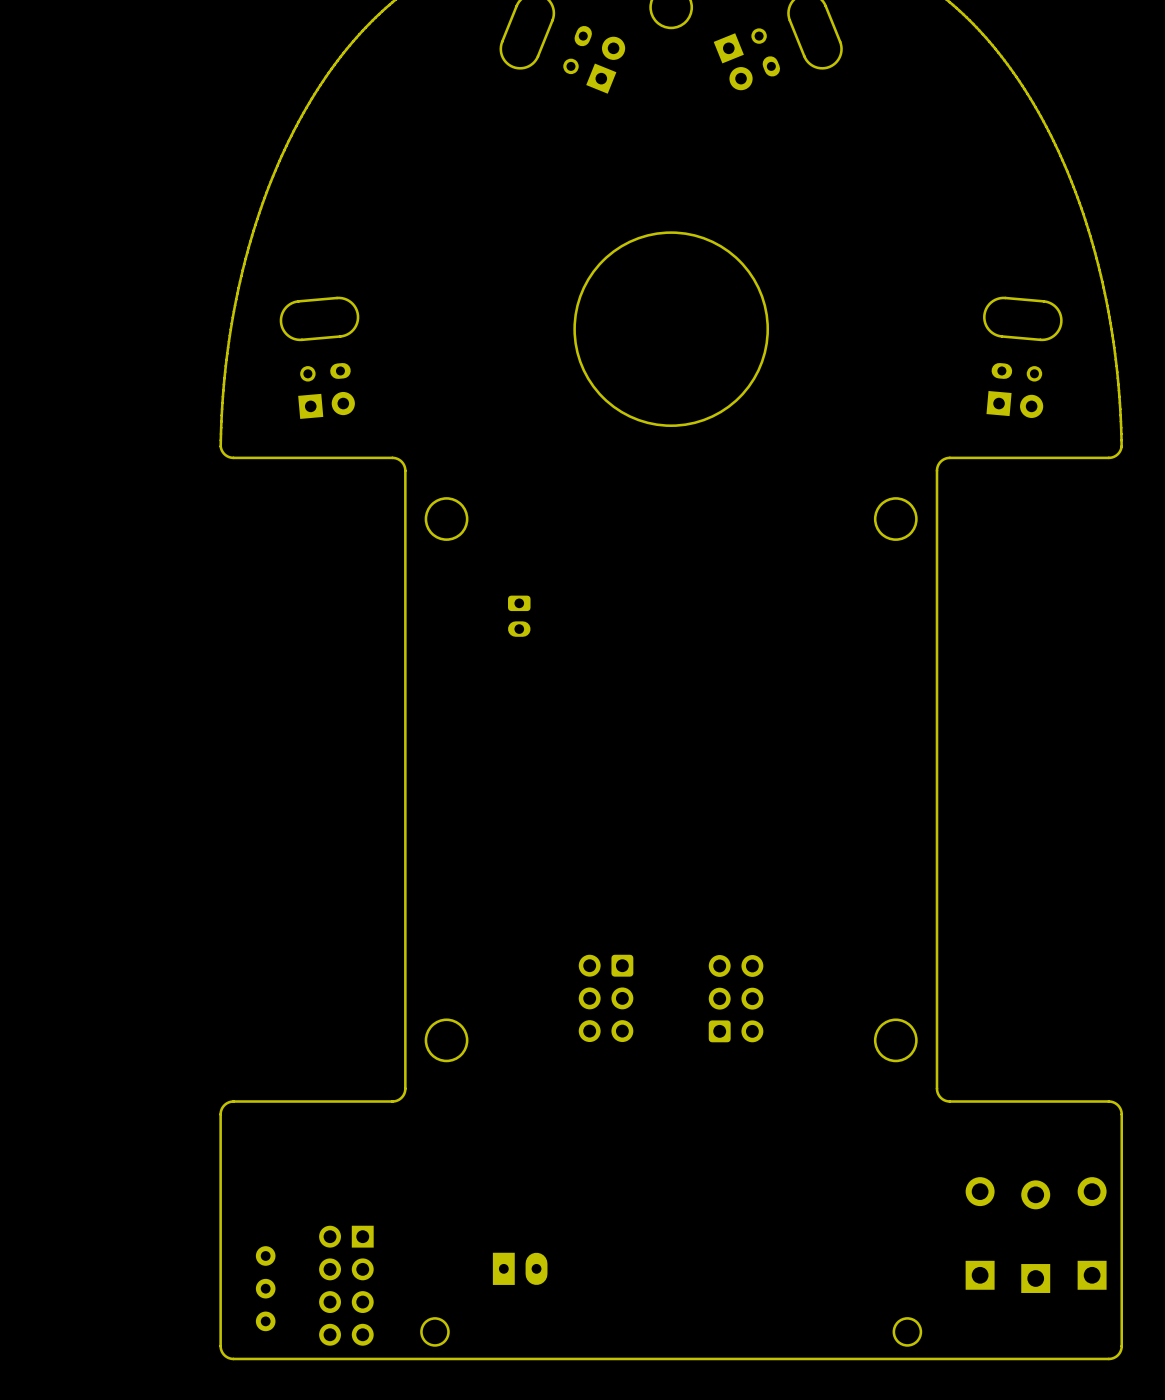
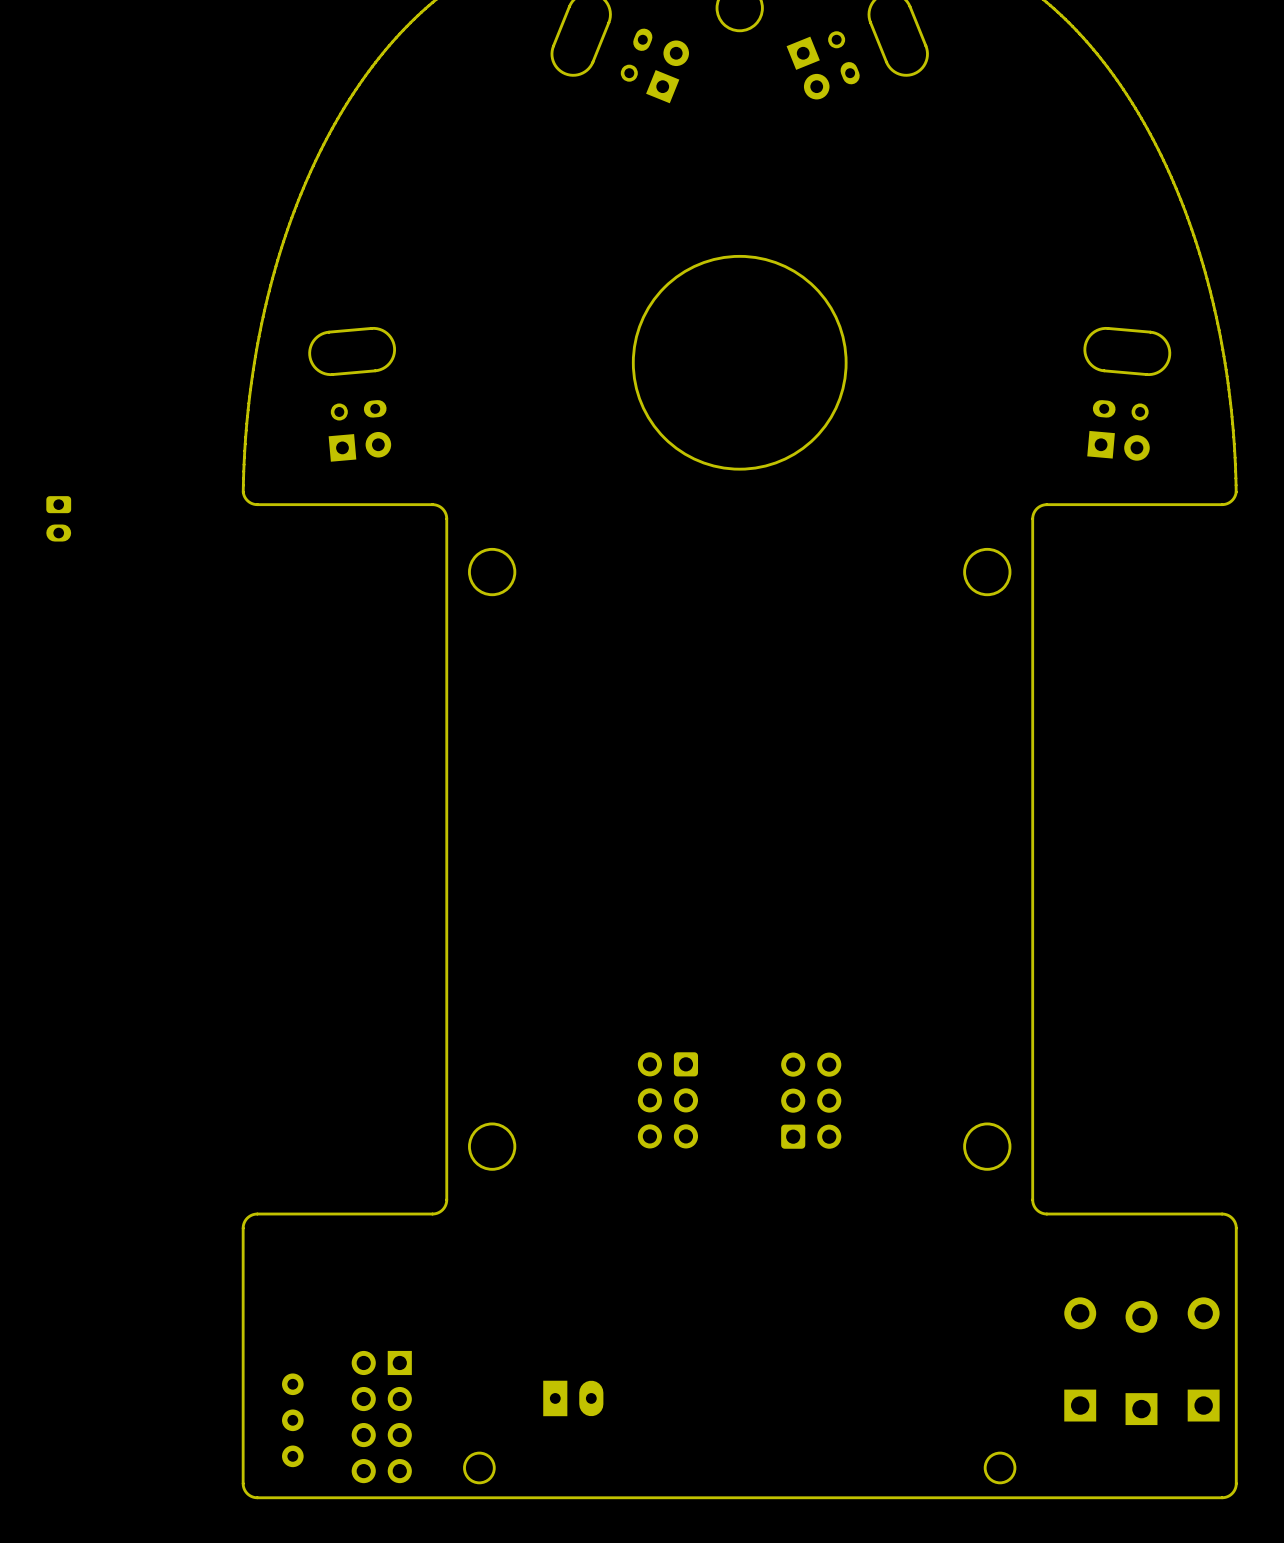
part: none -> (58, 518)
part: (519, 616) -> none

